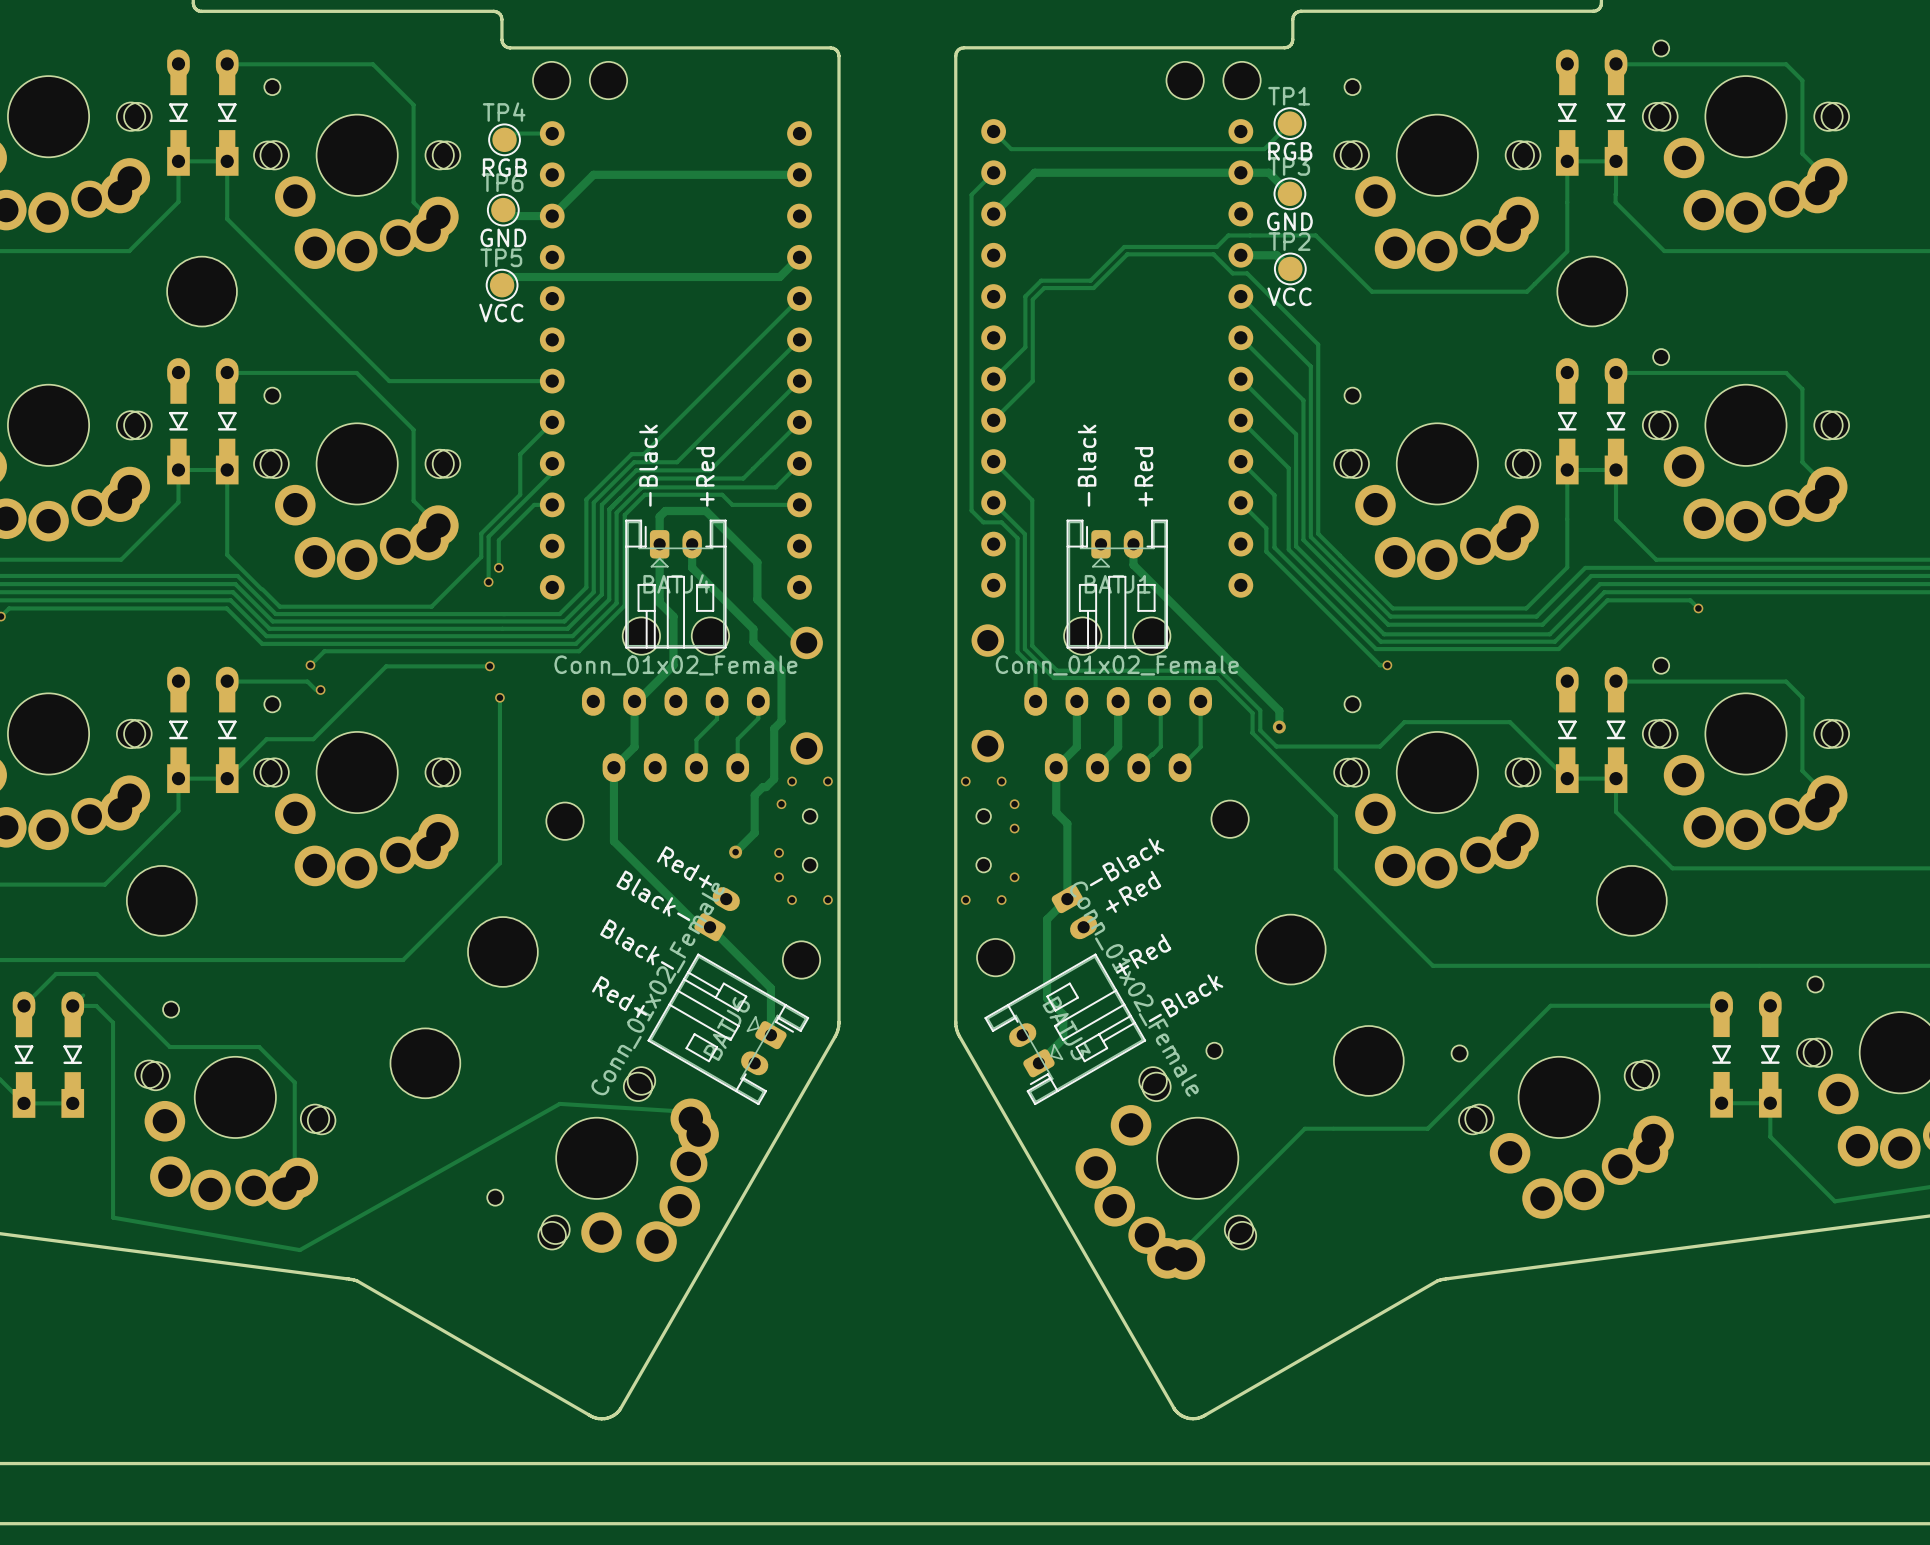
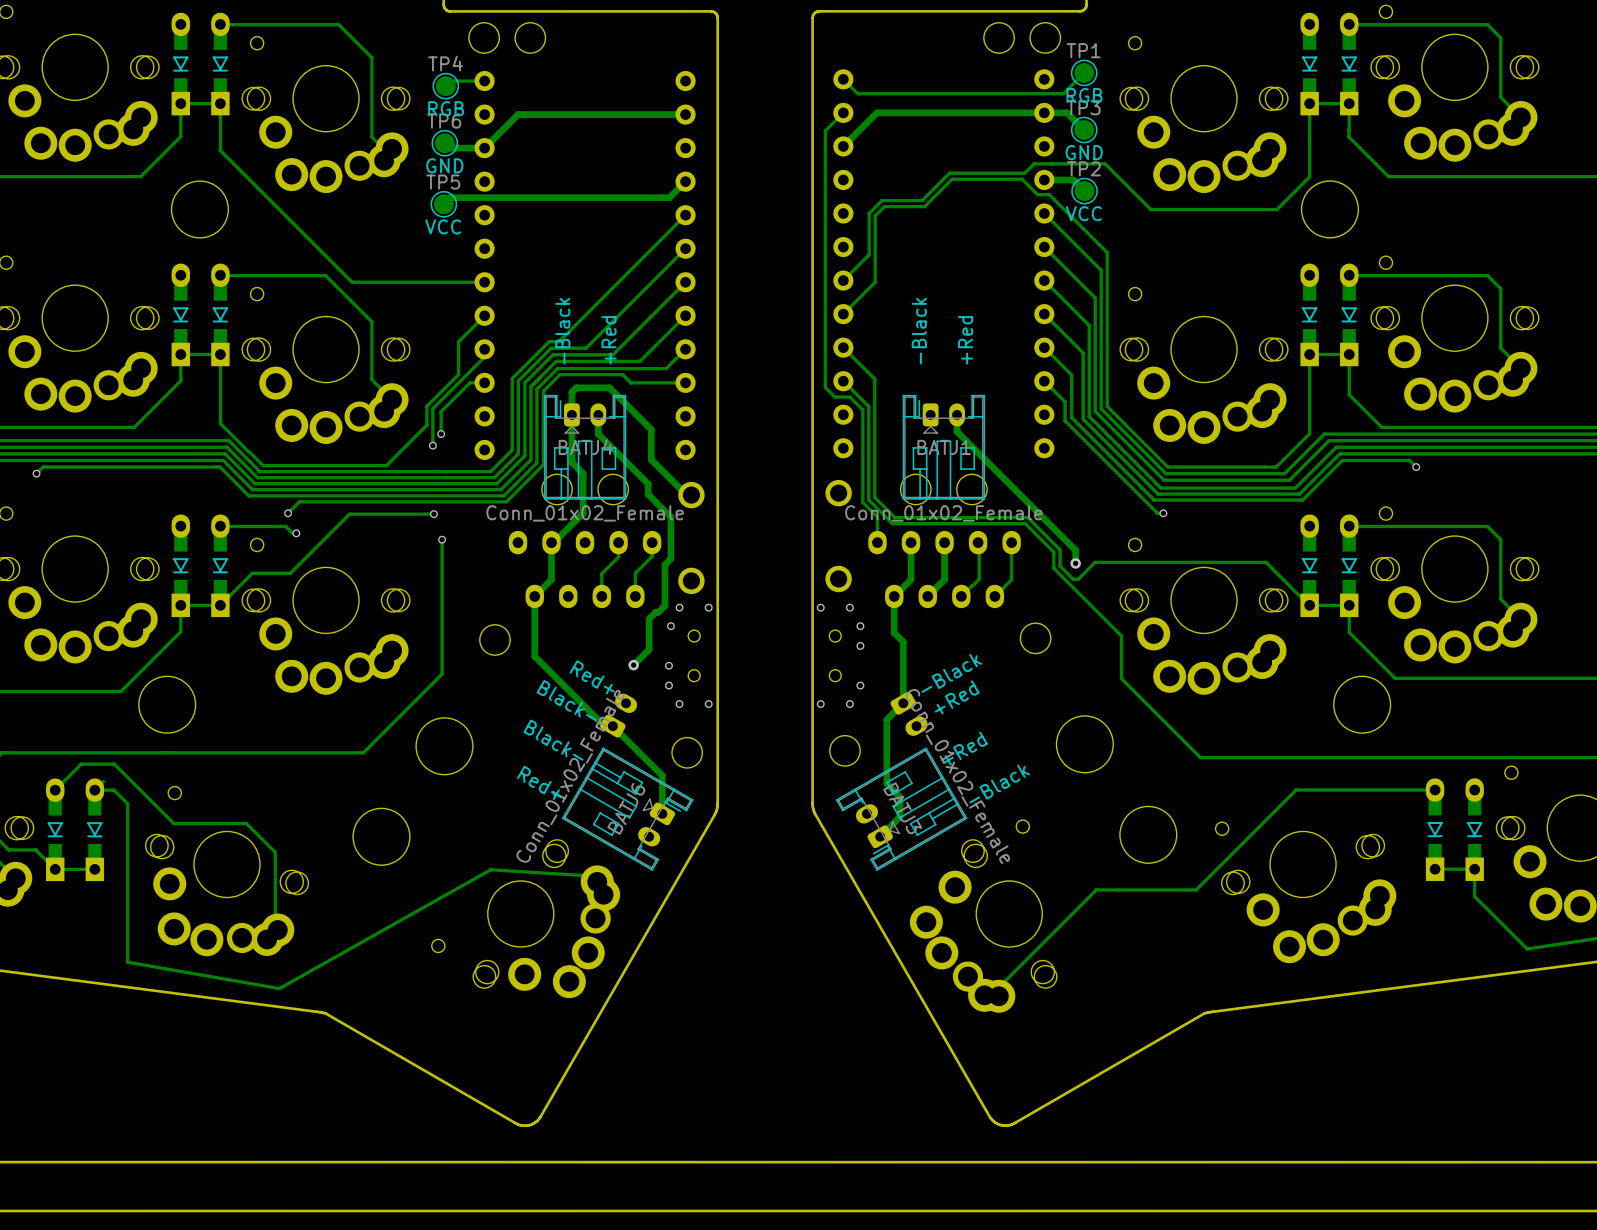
text position: -Black (648, 465) -> -Black (562, 331)
text position: -Black (1087, 465) -> -Black (919, 331)
text position: +Red (705, 476) -> +Red (609, 340)
text position: +Red (1143, 476) -> +Red (965, 340)
track: (1513, 725) (1510, 722) (1404, 722) (1380, 746) (1282, 746) -> (1266, 562) (1095, 562) (1078, 579)

